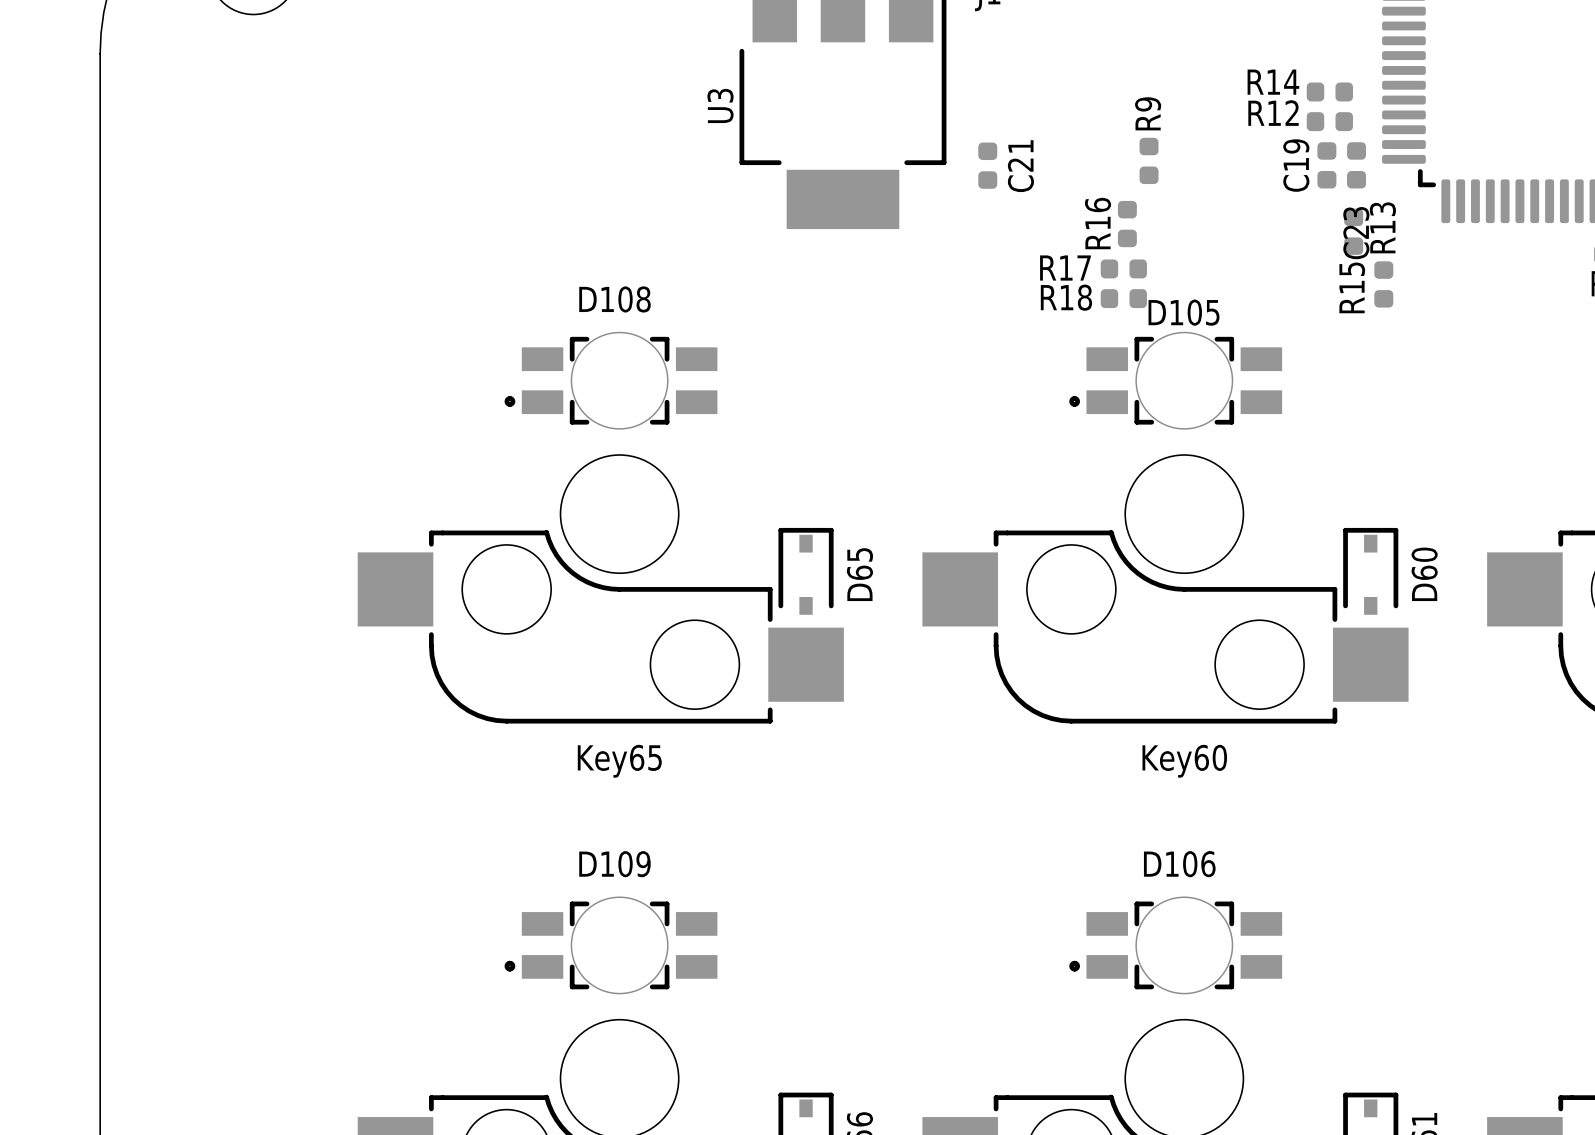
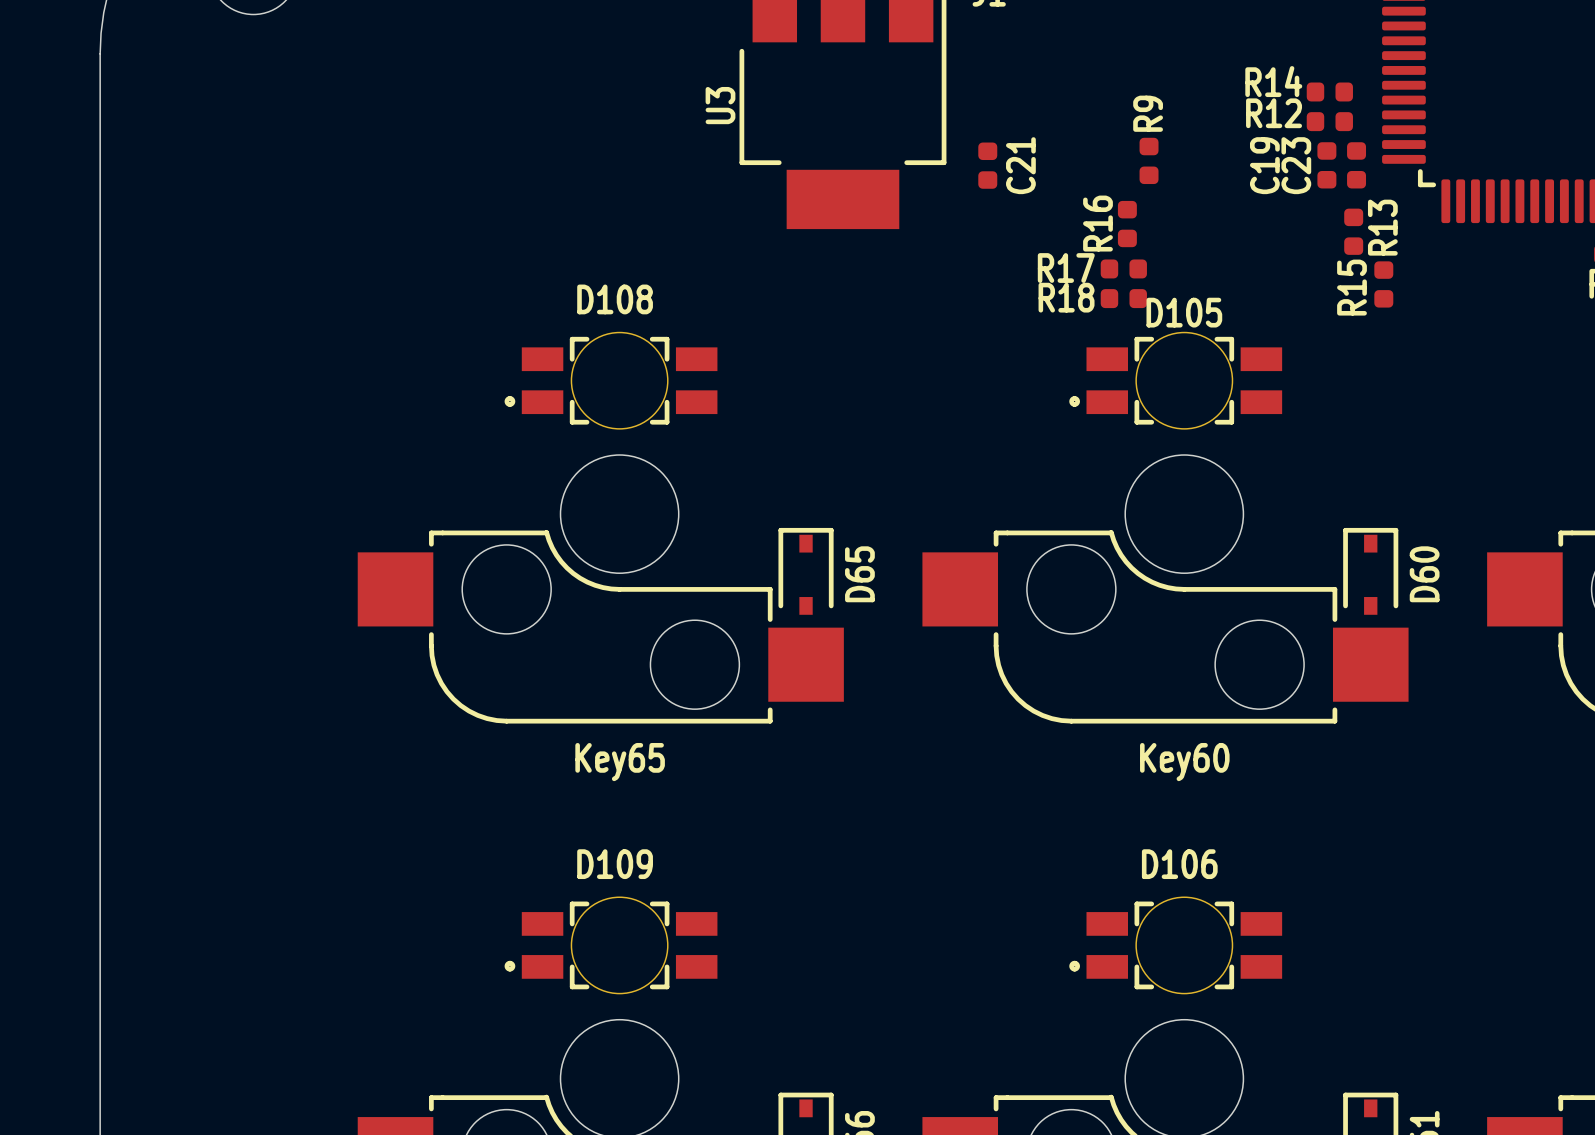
C19 name position: C19 (1296, 165) -> C19 (1264, 165)
C23 name position: C23 (1356, 233) -> C23 (1296, 165)

